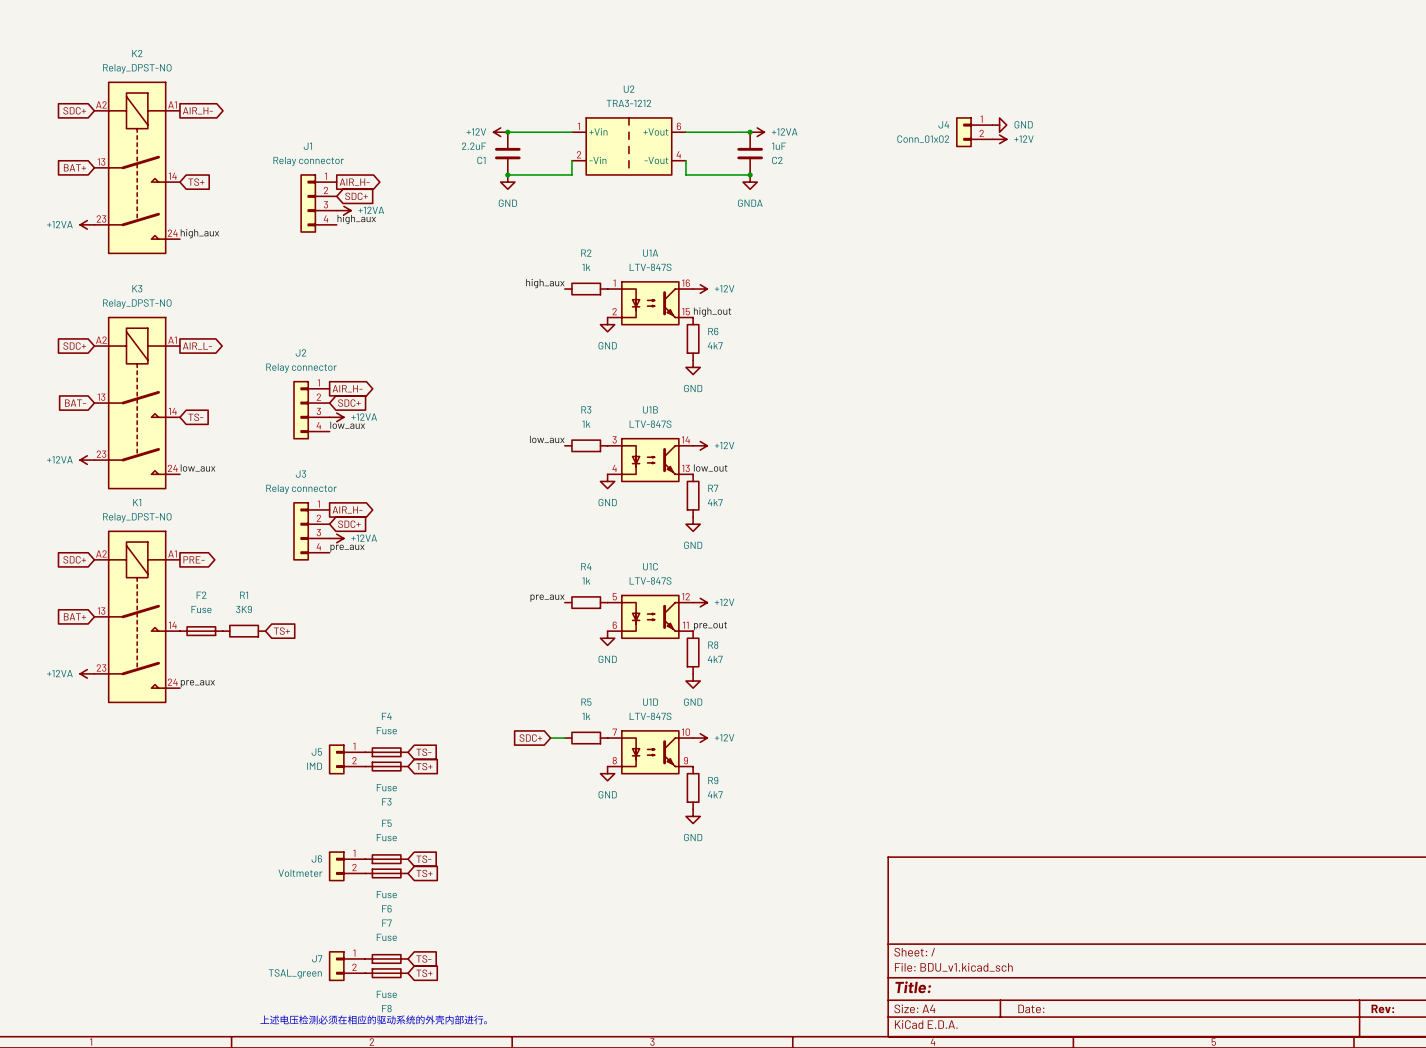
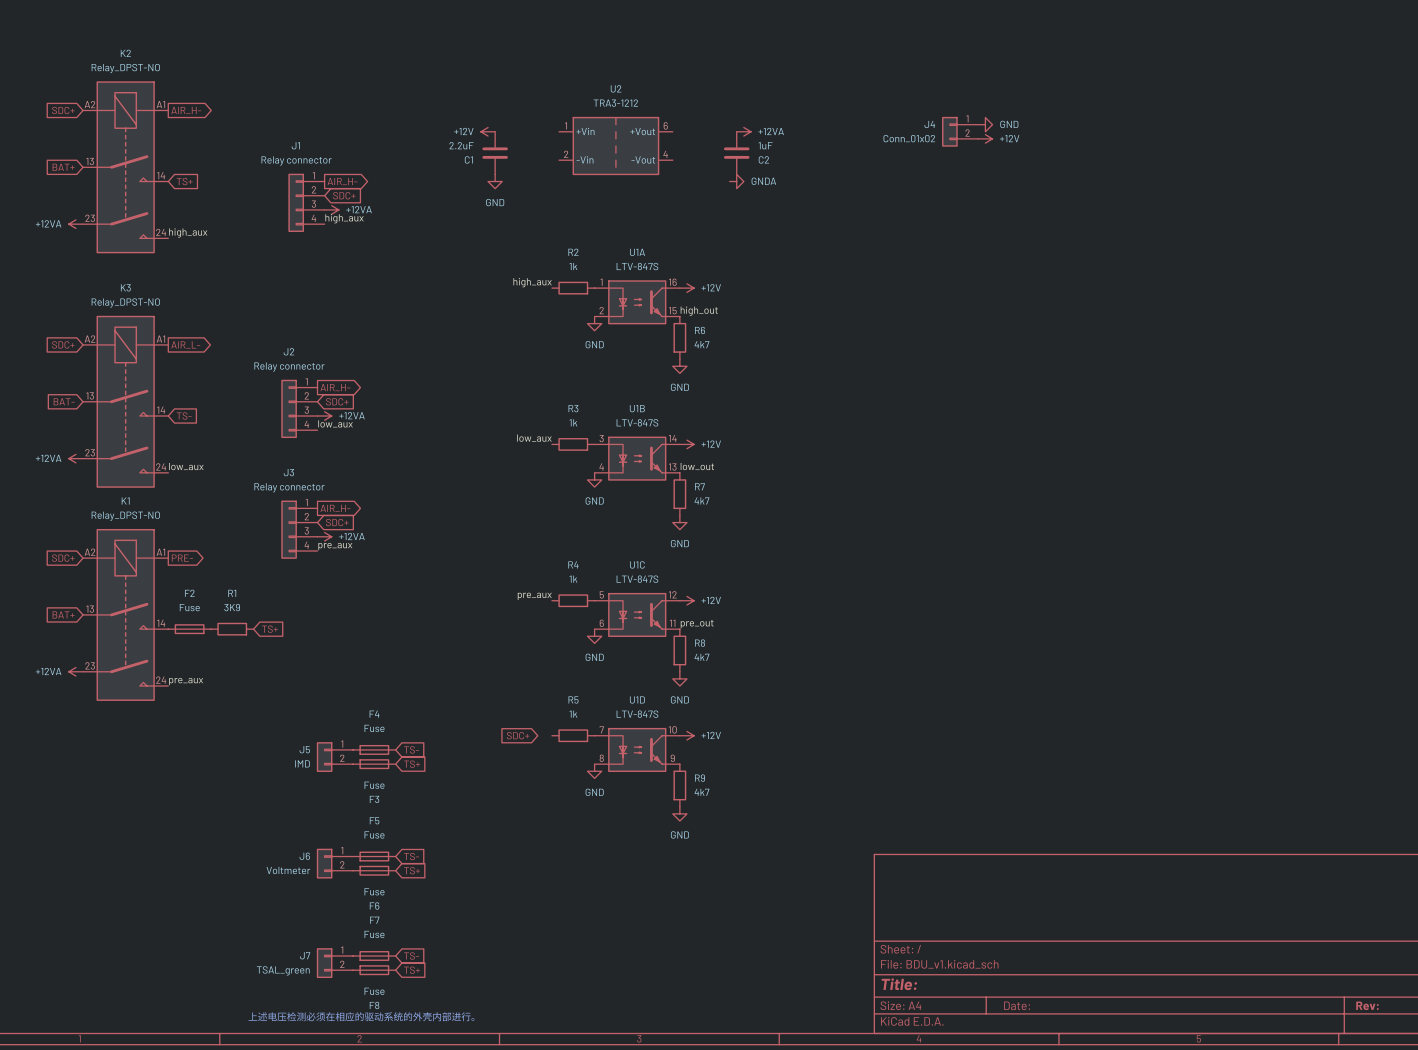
wire: (507, 132) (571, 132) -> none
junction: (507, 132) -> none
wire: (685, 132) (750, 132) -> none
junction: (750, 132) -> none
wire: (571, 160) (571, 174) (507, 174) -> none
wire: (685, 160) (685, 174) (750, 174) -> none
junction: (507, 174) -> none
junction: (750, 174) -> none
power symbol rotation: 0° (750, 182) -> 90° counterclockwise (736, 181)
wire: (550, 738) (564, 738) -> none

